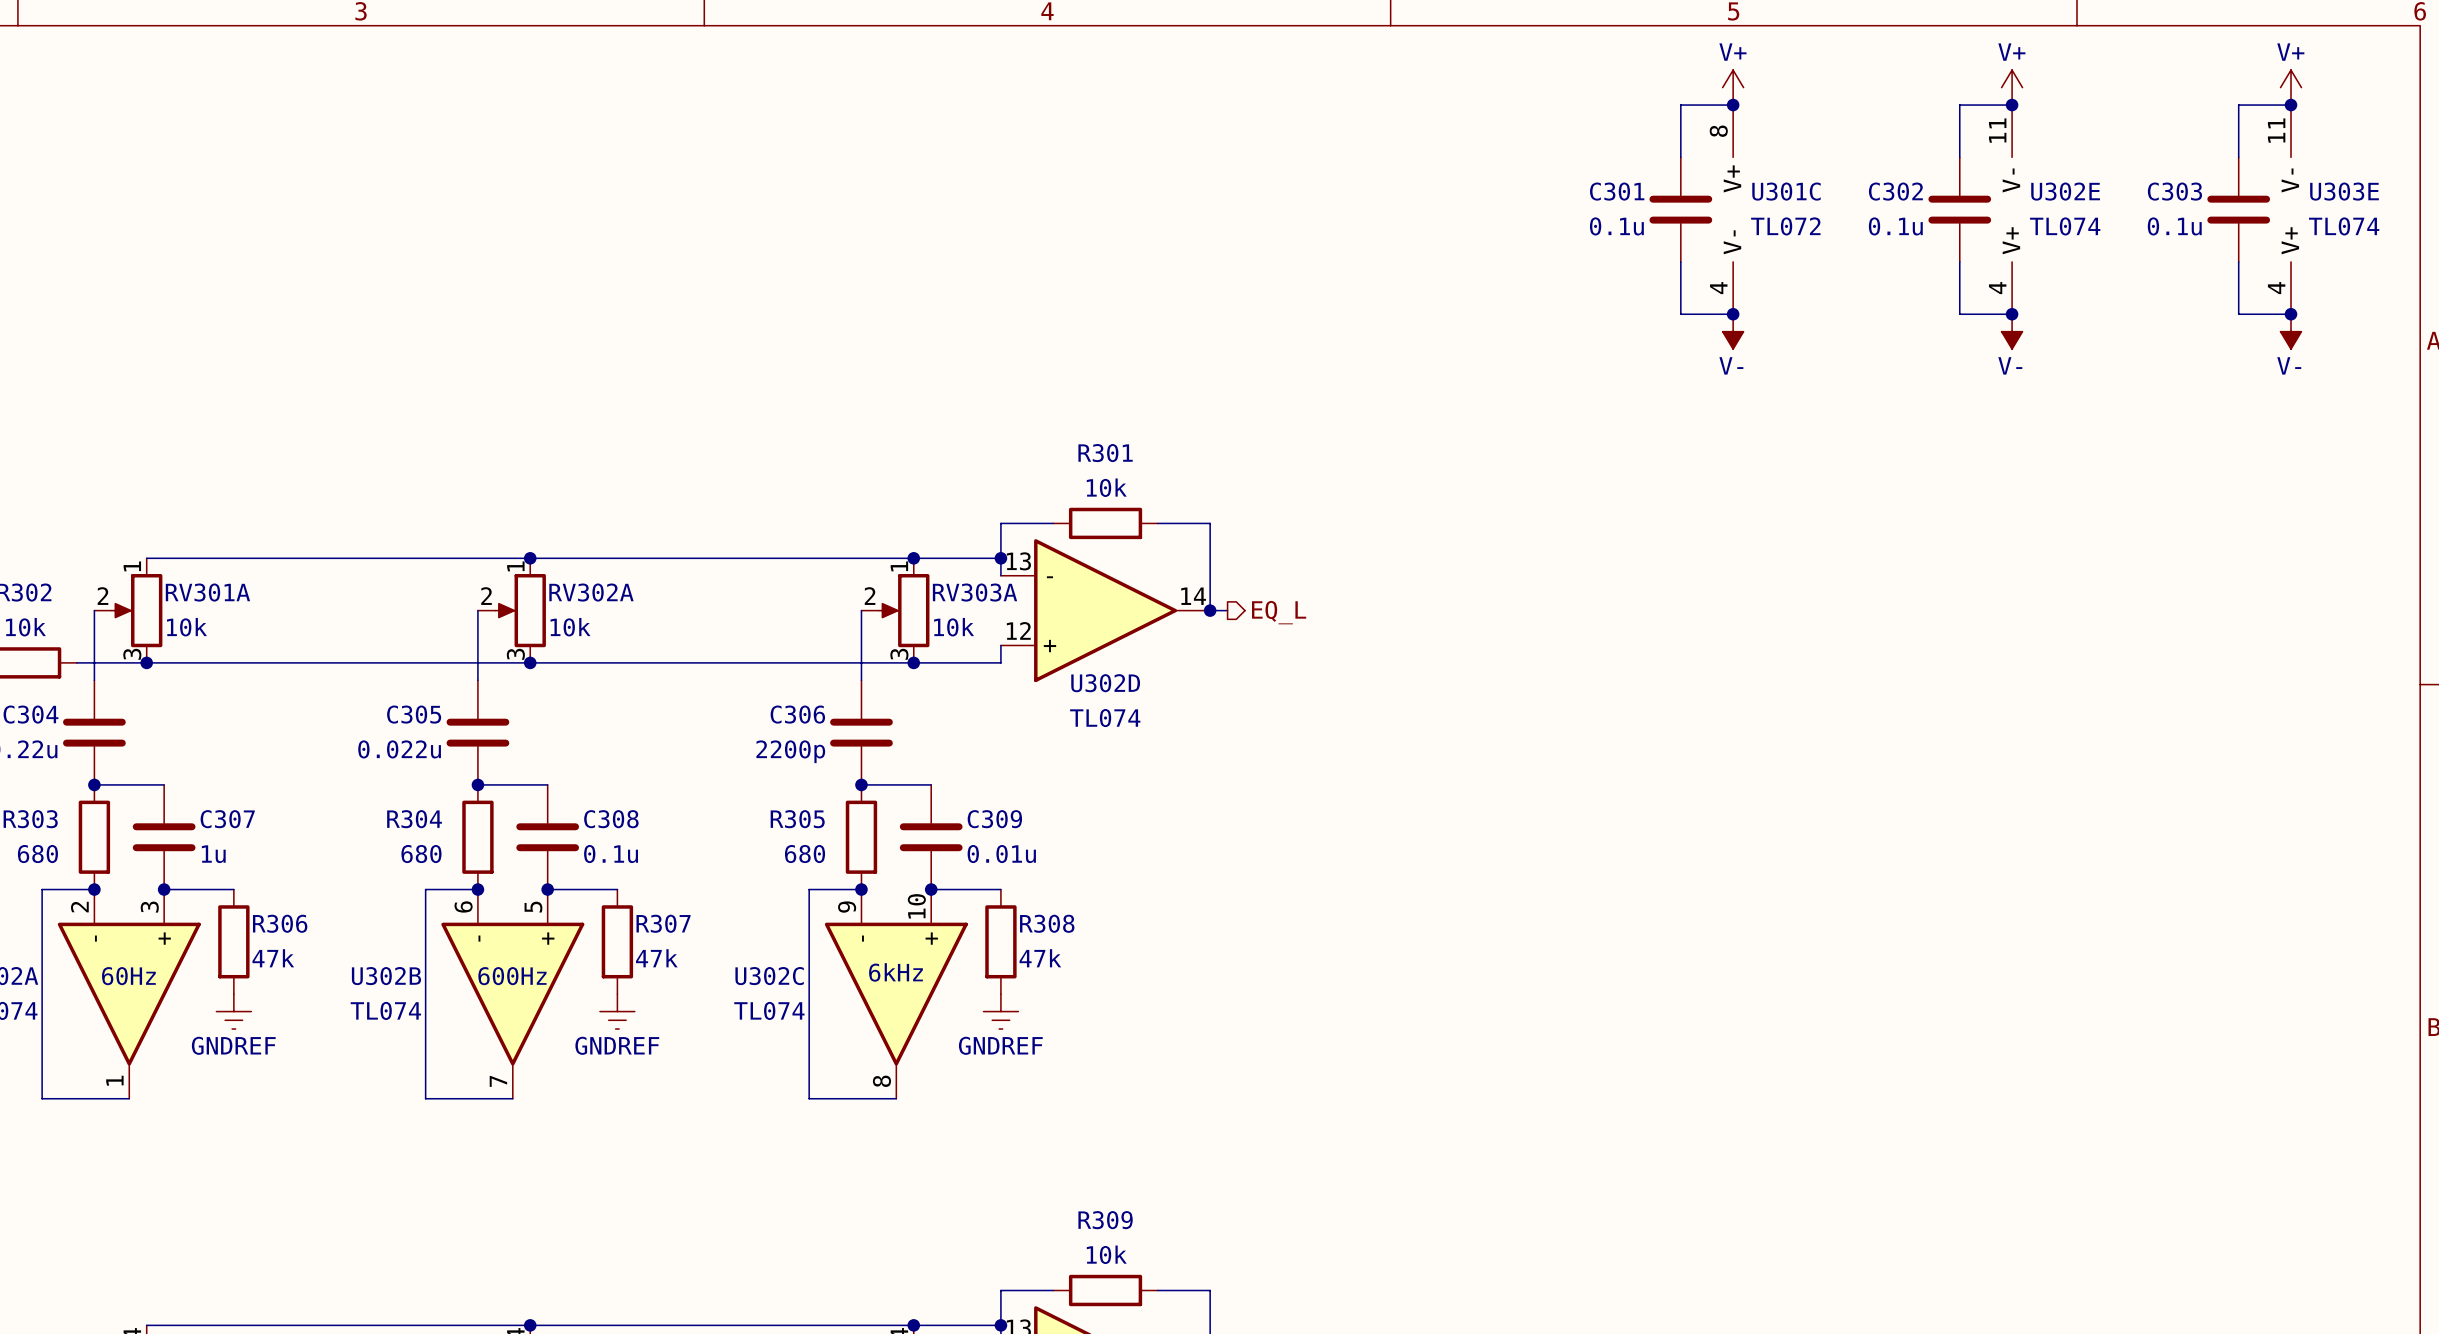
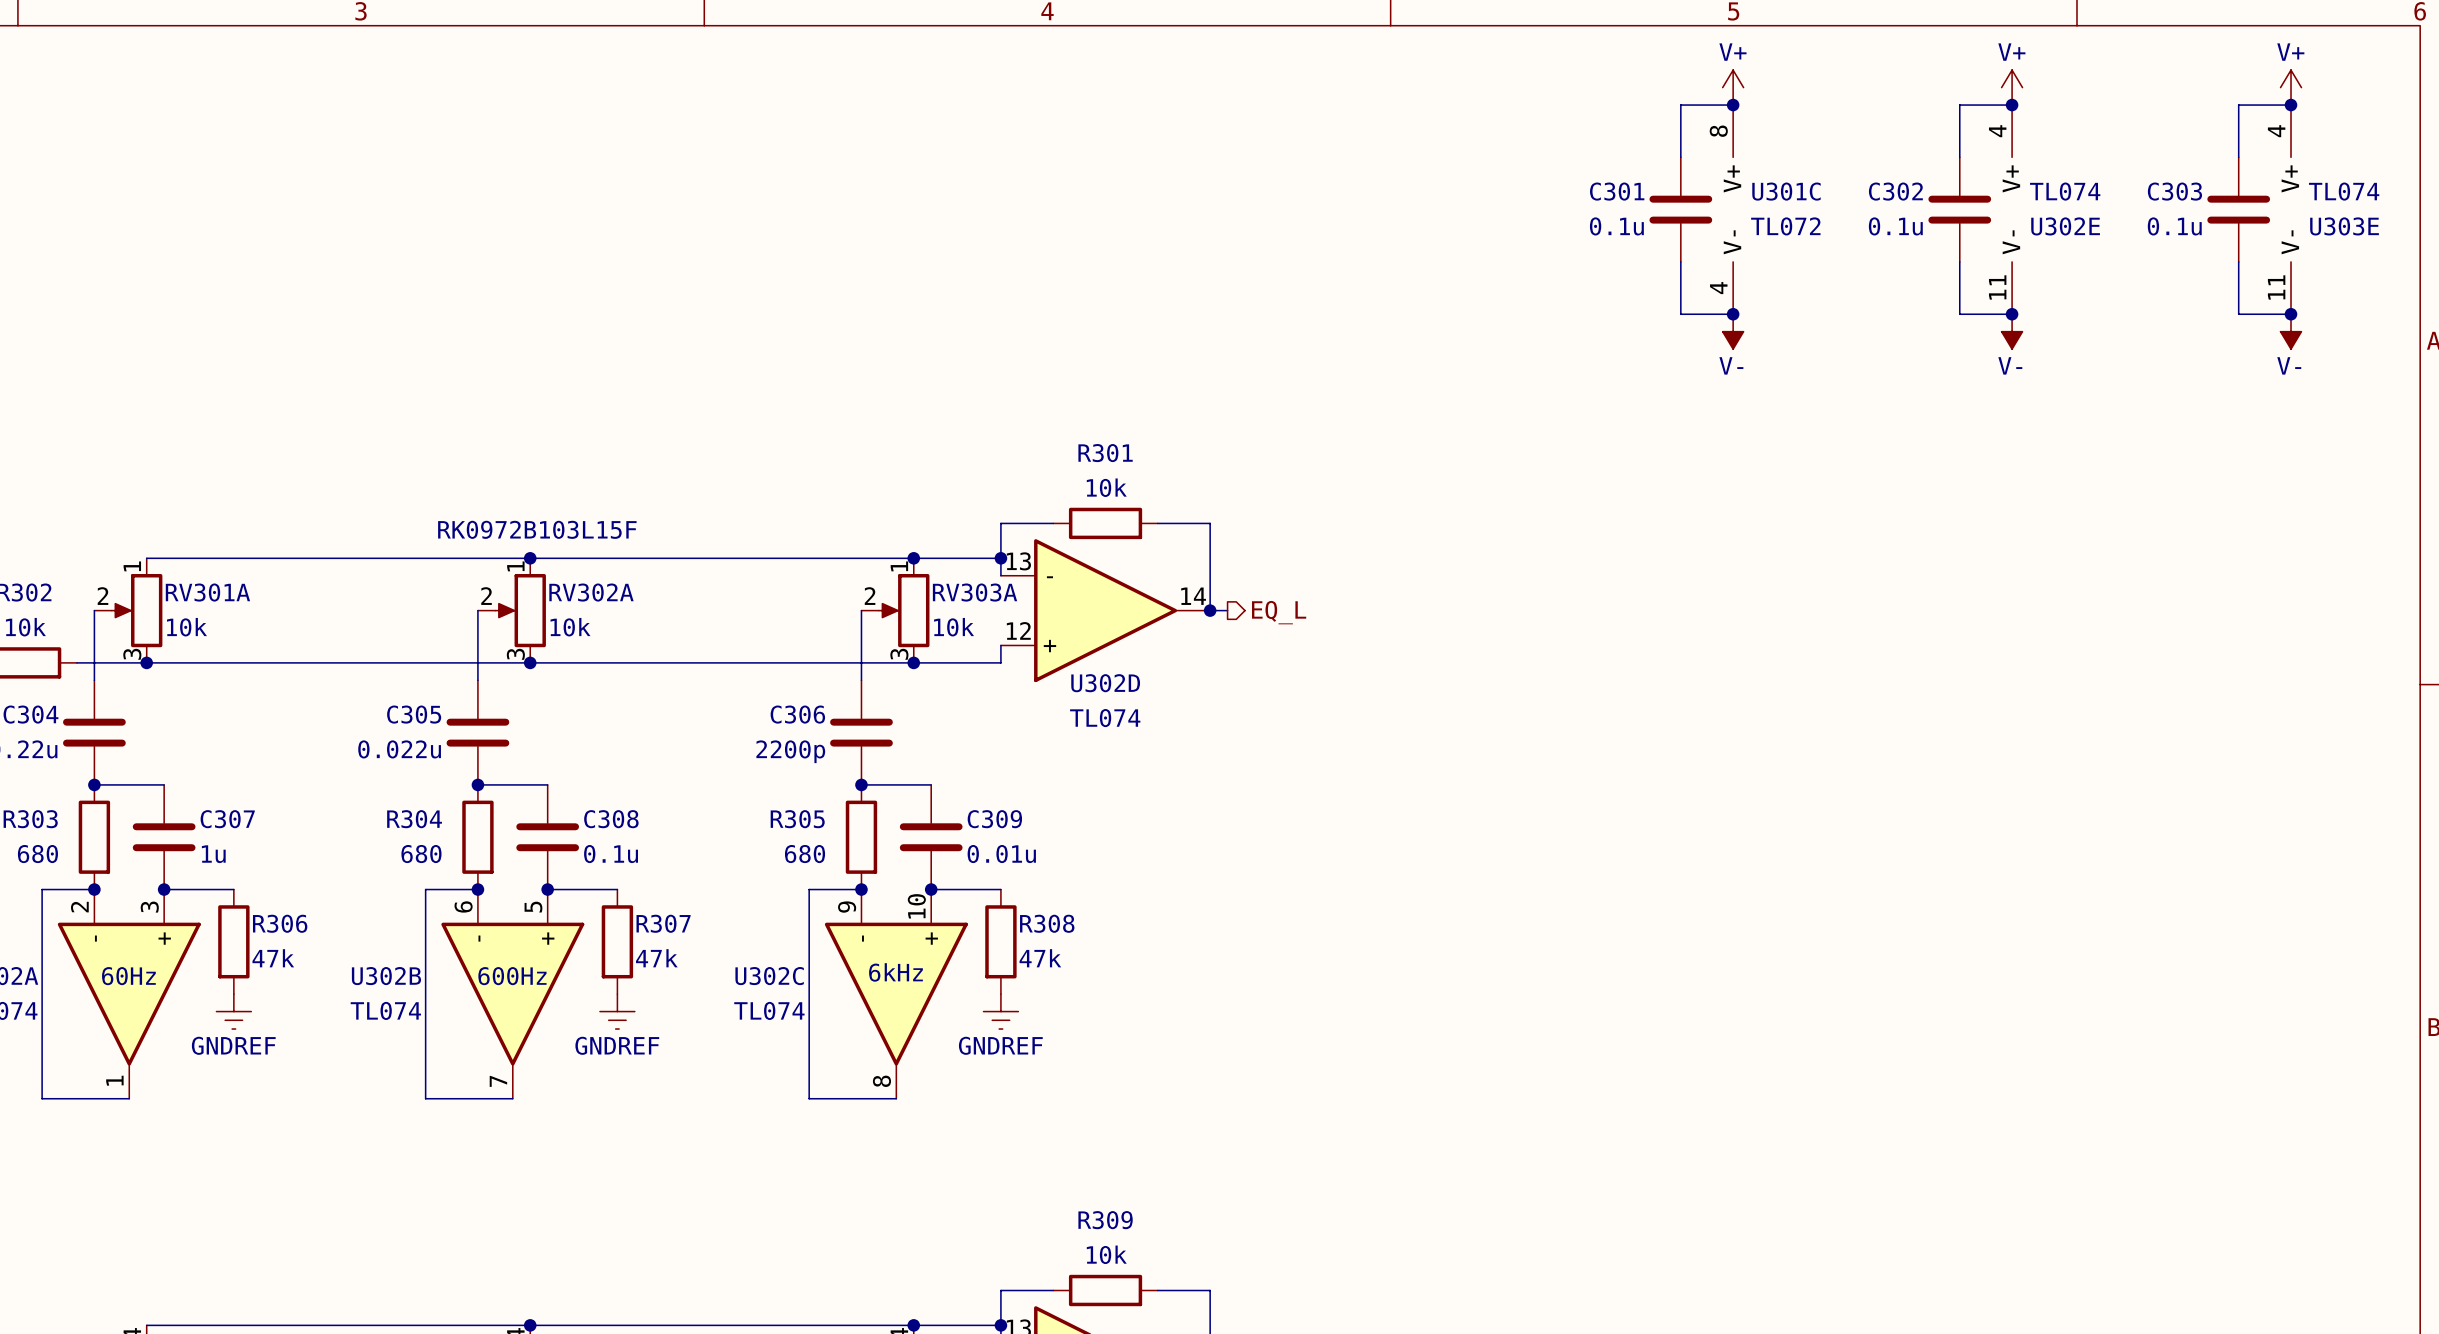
U302E name position: U302E (2065, 191) -> U302E (2065, 226)
U303E name position: U303E (2344, 191) -> U303E (2344, 226)
U302E rotation: 0° (2012, 209) -> 180° (2012, 209)
U303E rotation: 0° (2291, 209) -> 180° (2291, 209)
U302E value position: TL074 (2065, 226) -> TL074 (2065, 191)
U303E value position: TL074 (2344, 226) -> TL074 (2344, 191)
text: none -> RK0972B103L15F (537, 529)

